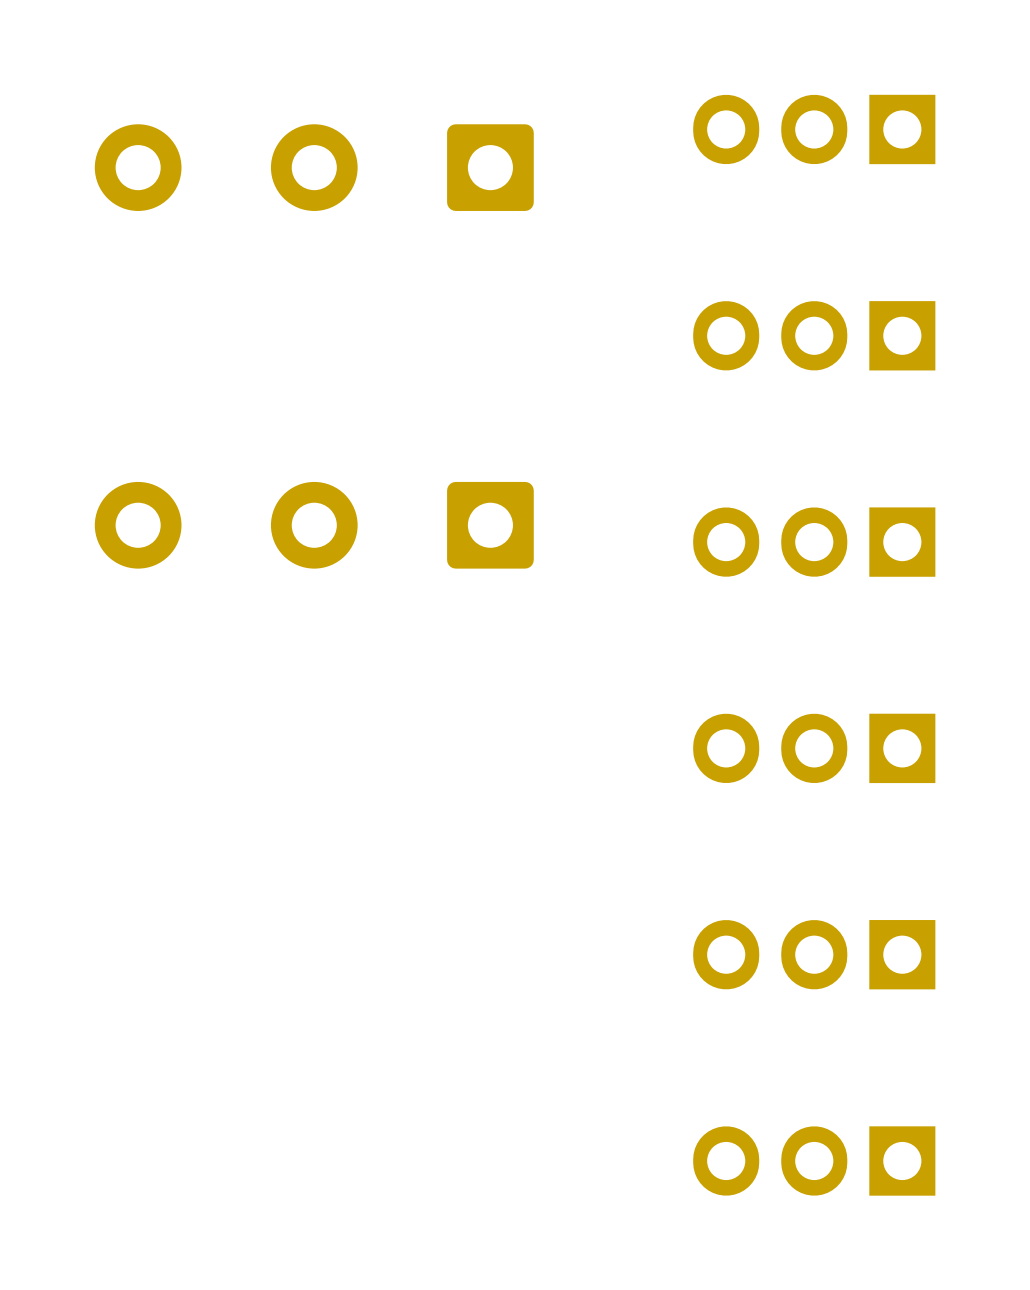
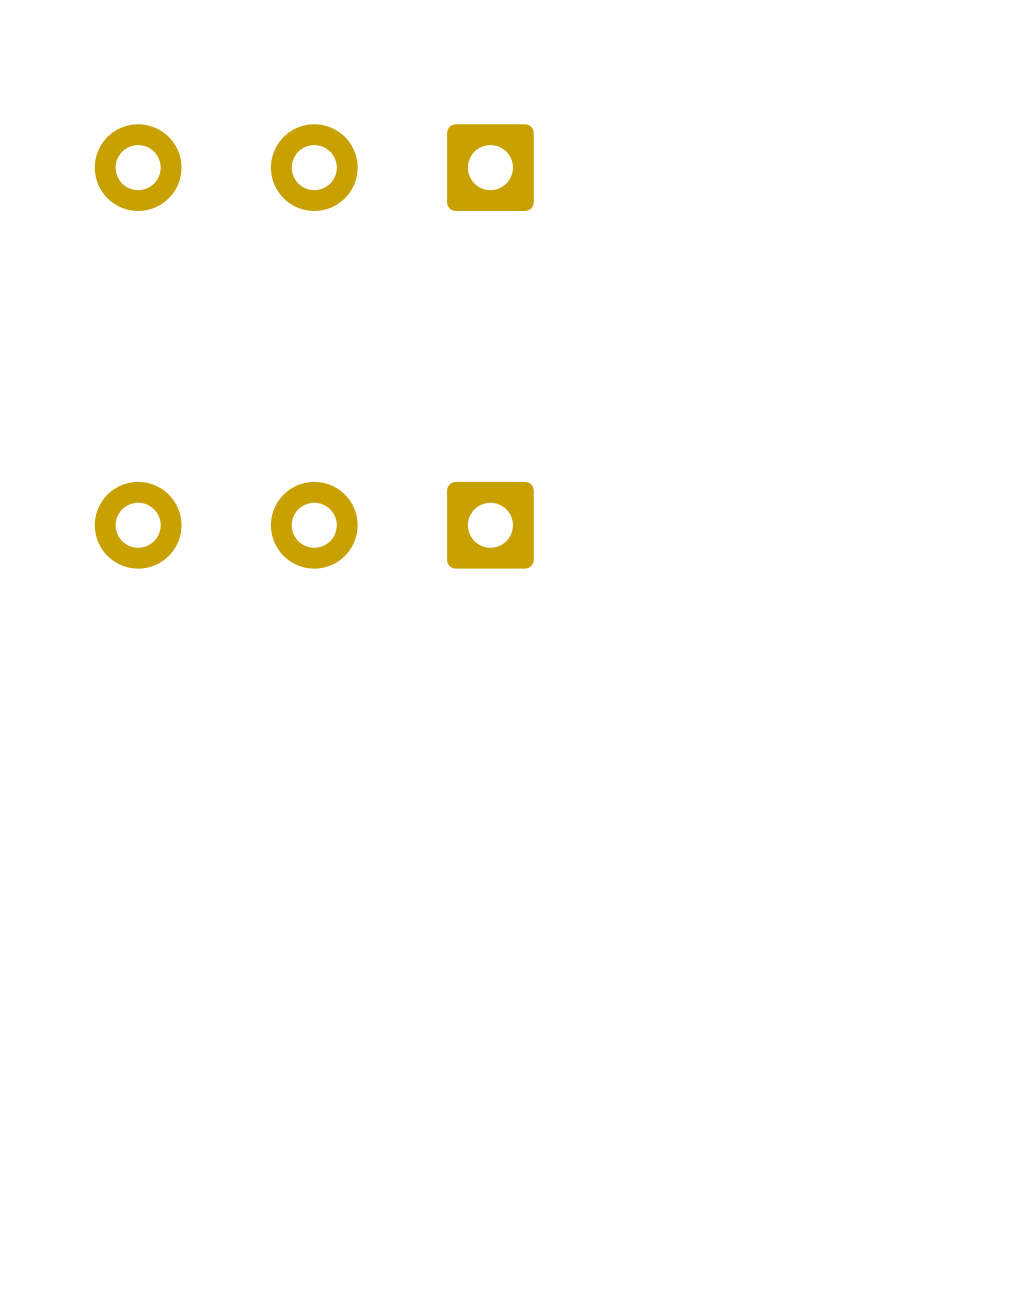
part: (814, 129) -> none
part: (814, 335) -> none
part: (814, 542) -> none
part: (814, 748) -> none
part: (814, 954) -> none
part: (814, 1161) -> none

